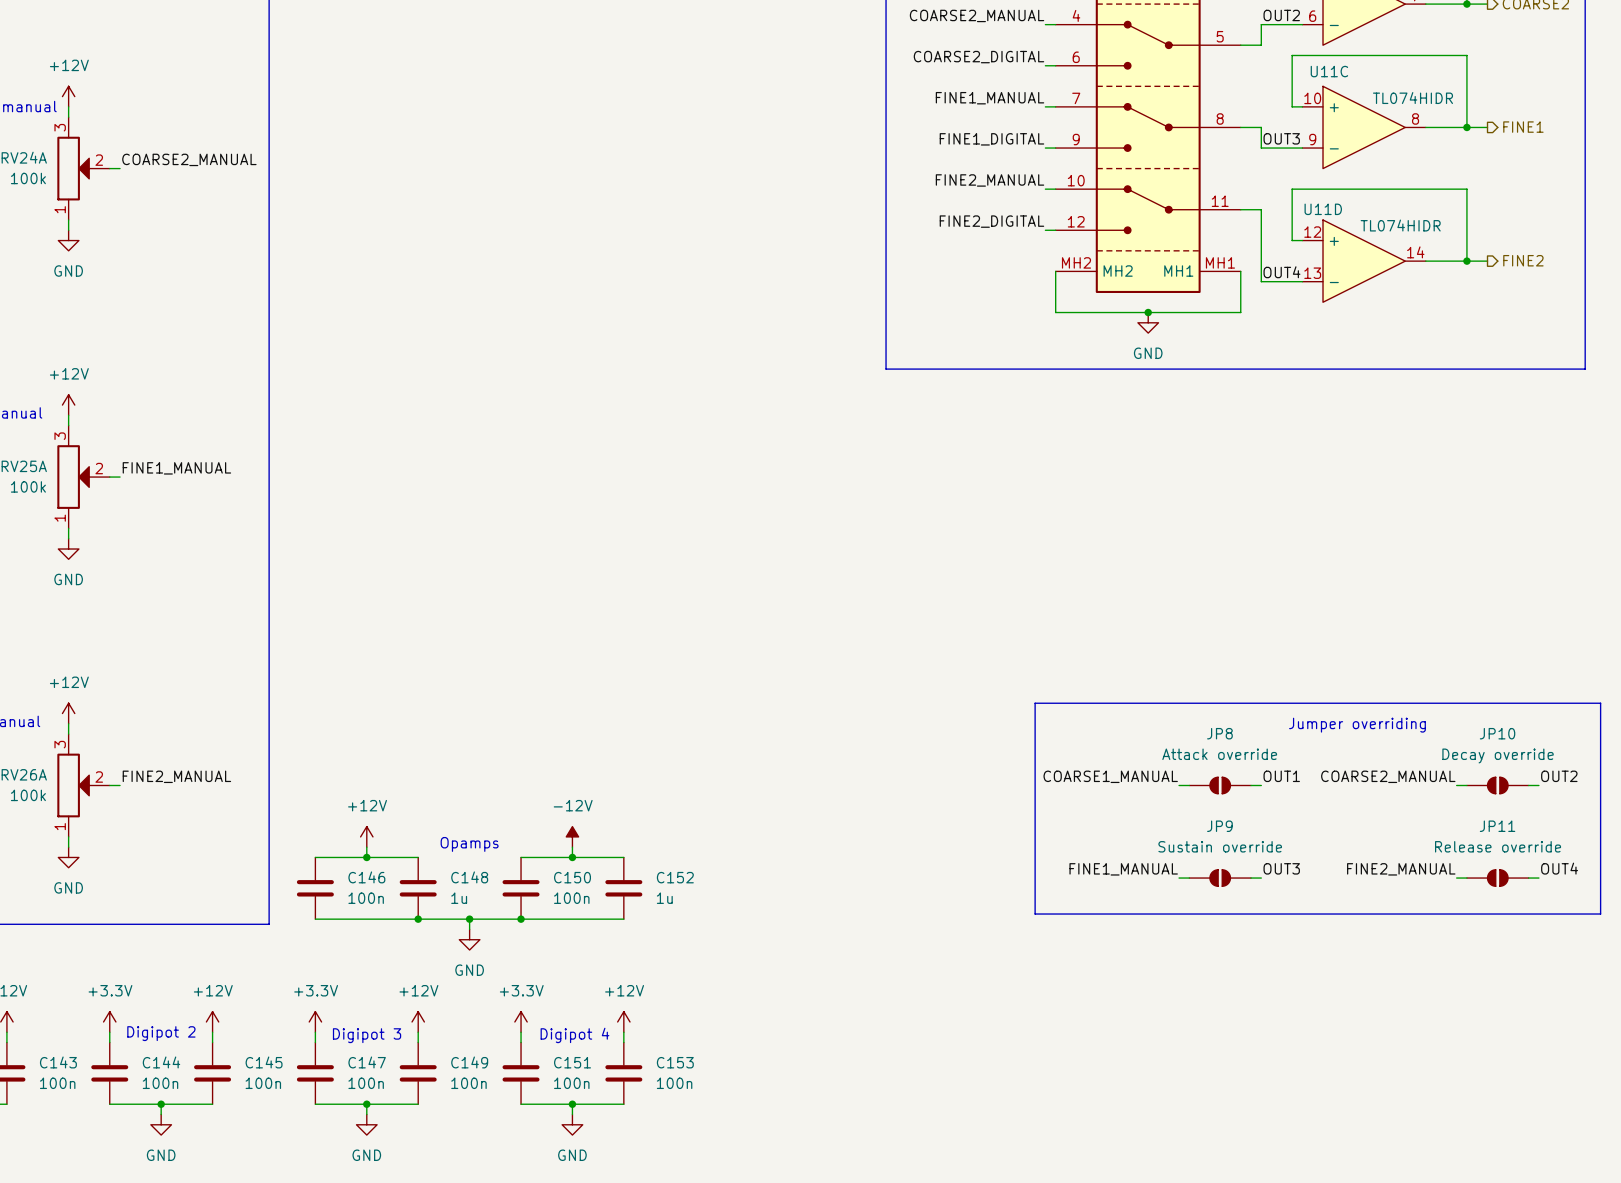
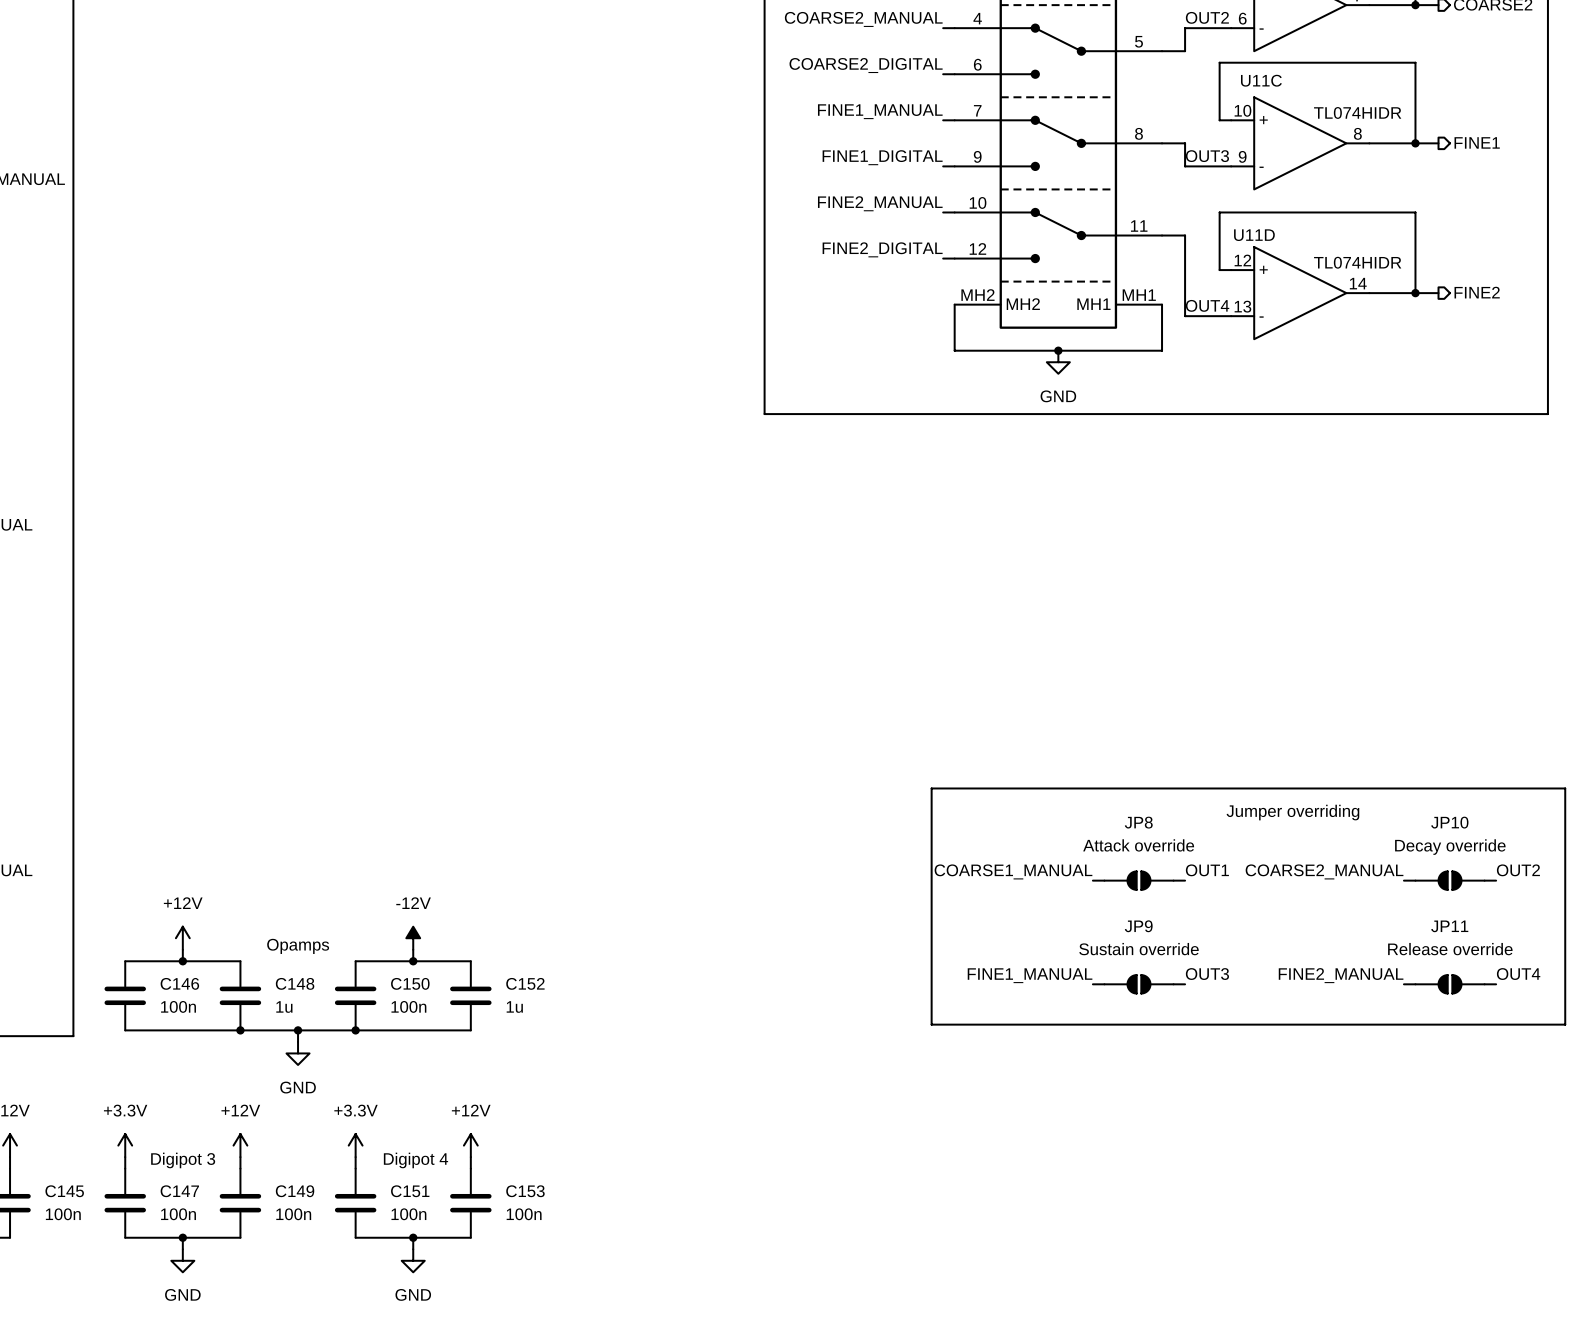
U11C value: TL074HIDR (1412, 98) -> none
U11C text: none -> TL074HIDR (1357, 112)
U11D value: TL074HIDR (1400, 225) -> none
U11D text: none -> TL074HIDR (1357, 262)

